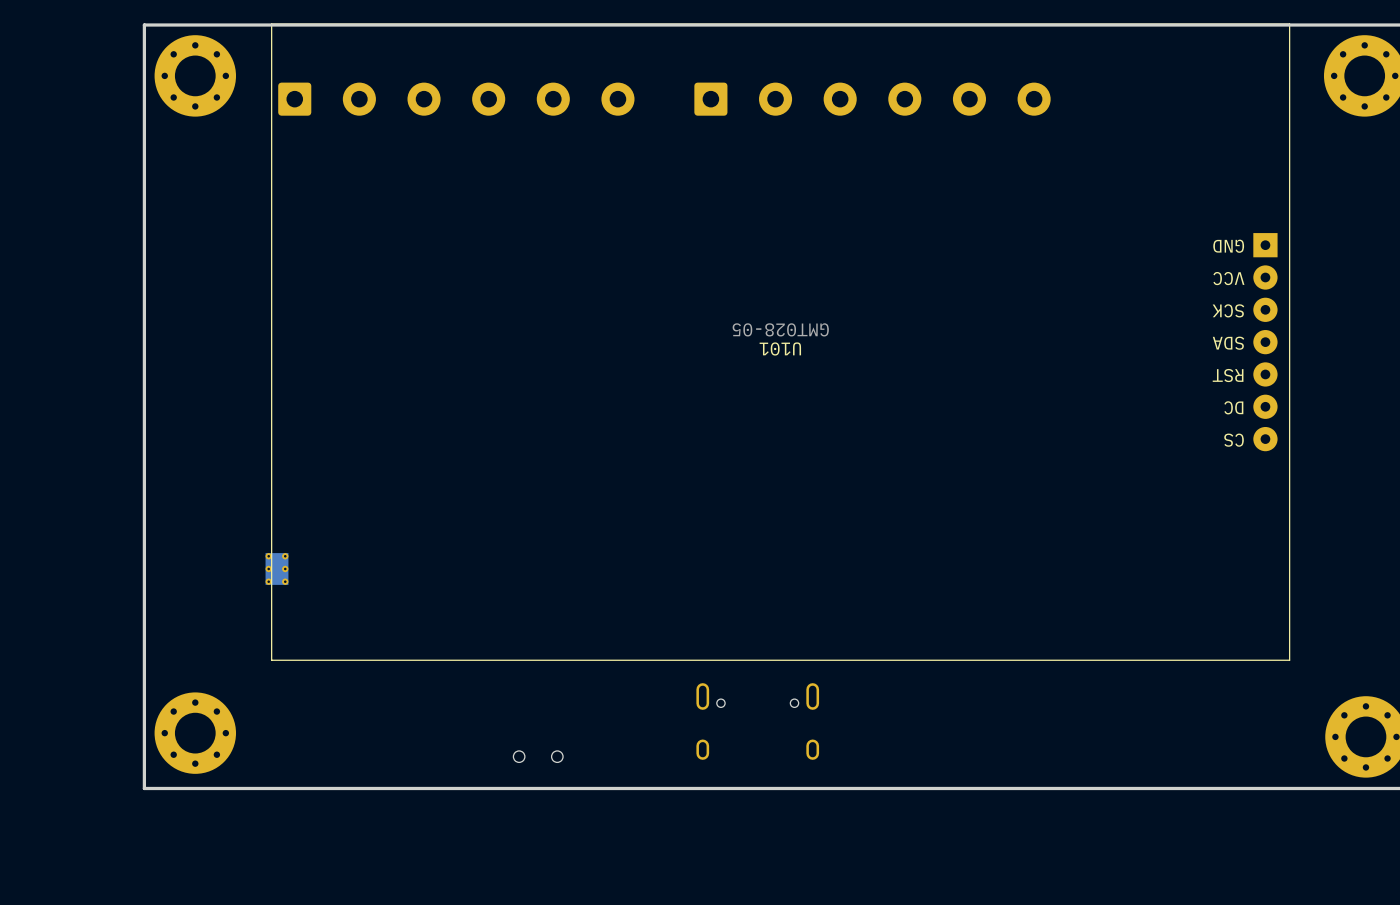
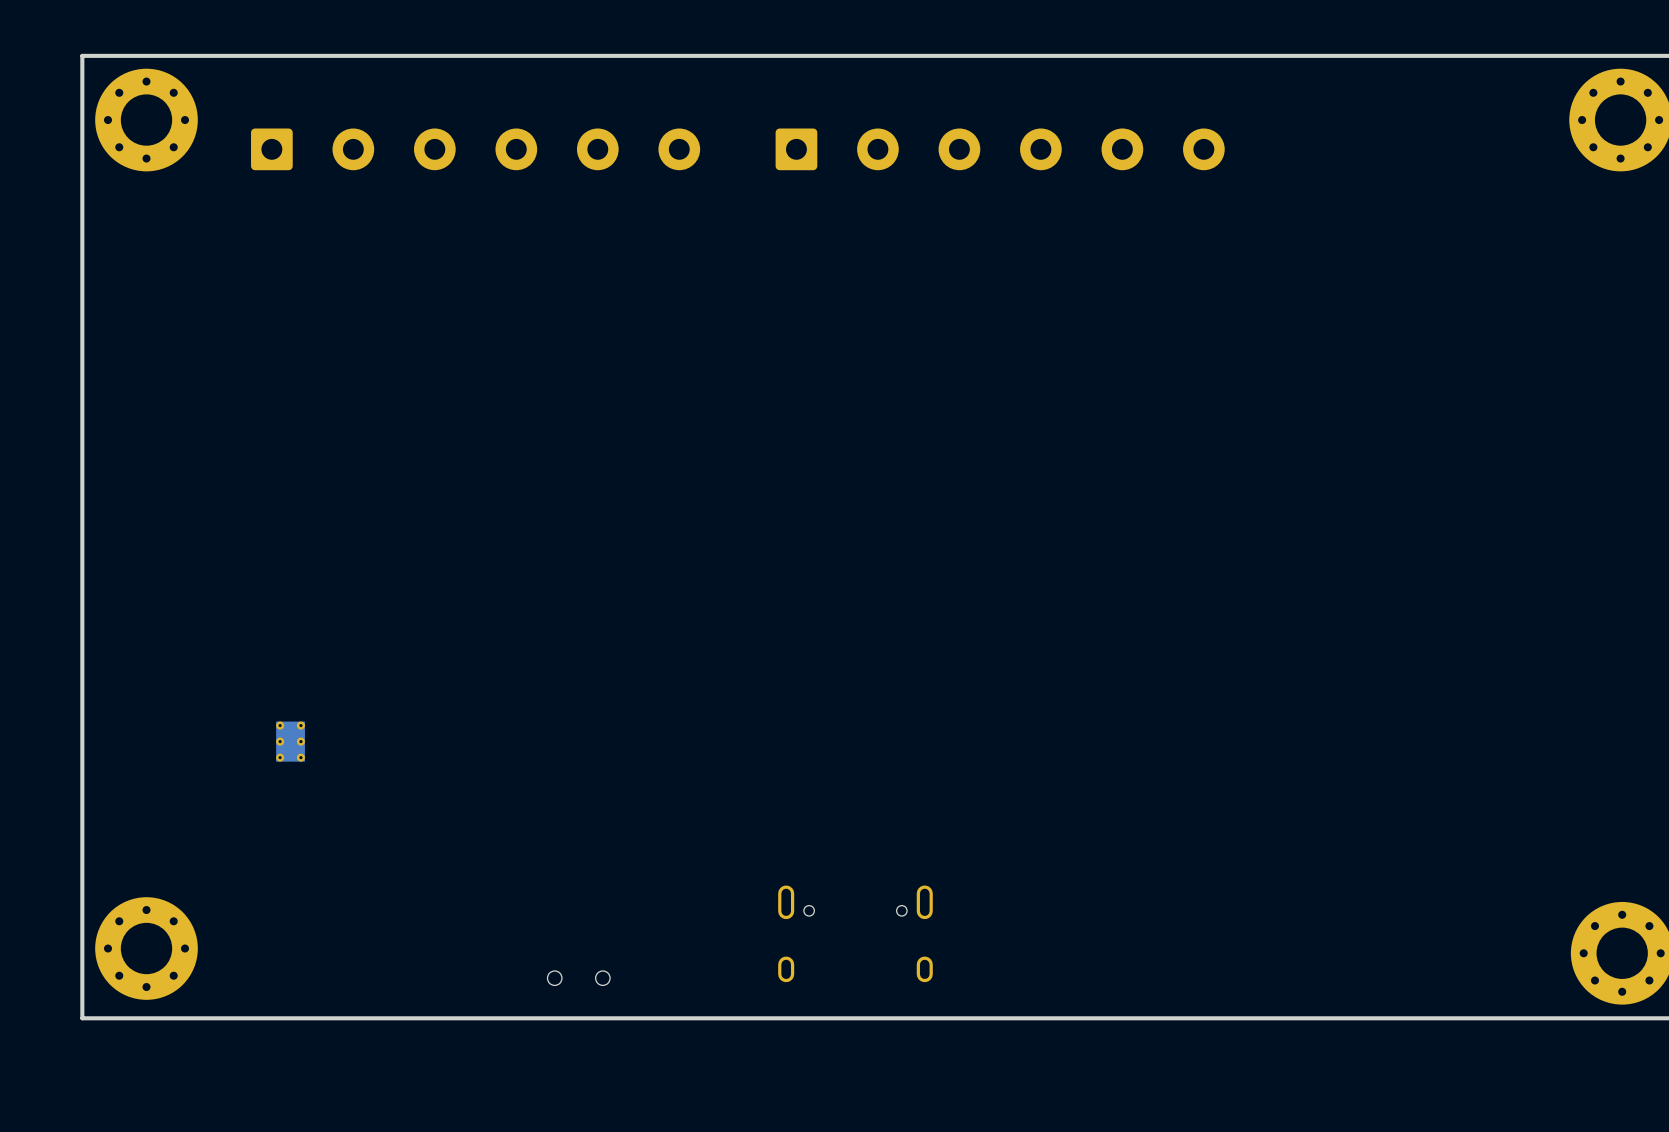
U101: GMT028-05 (780, 342) -> none
part position: (276, 568) -> (290, 741)

